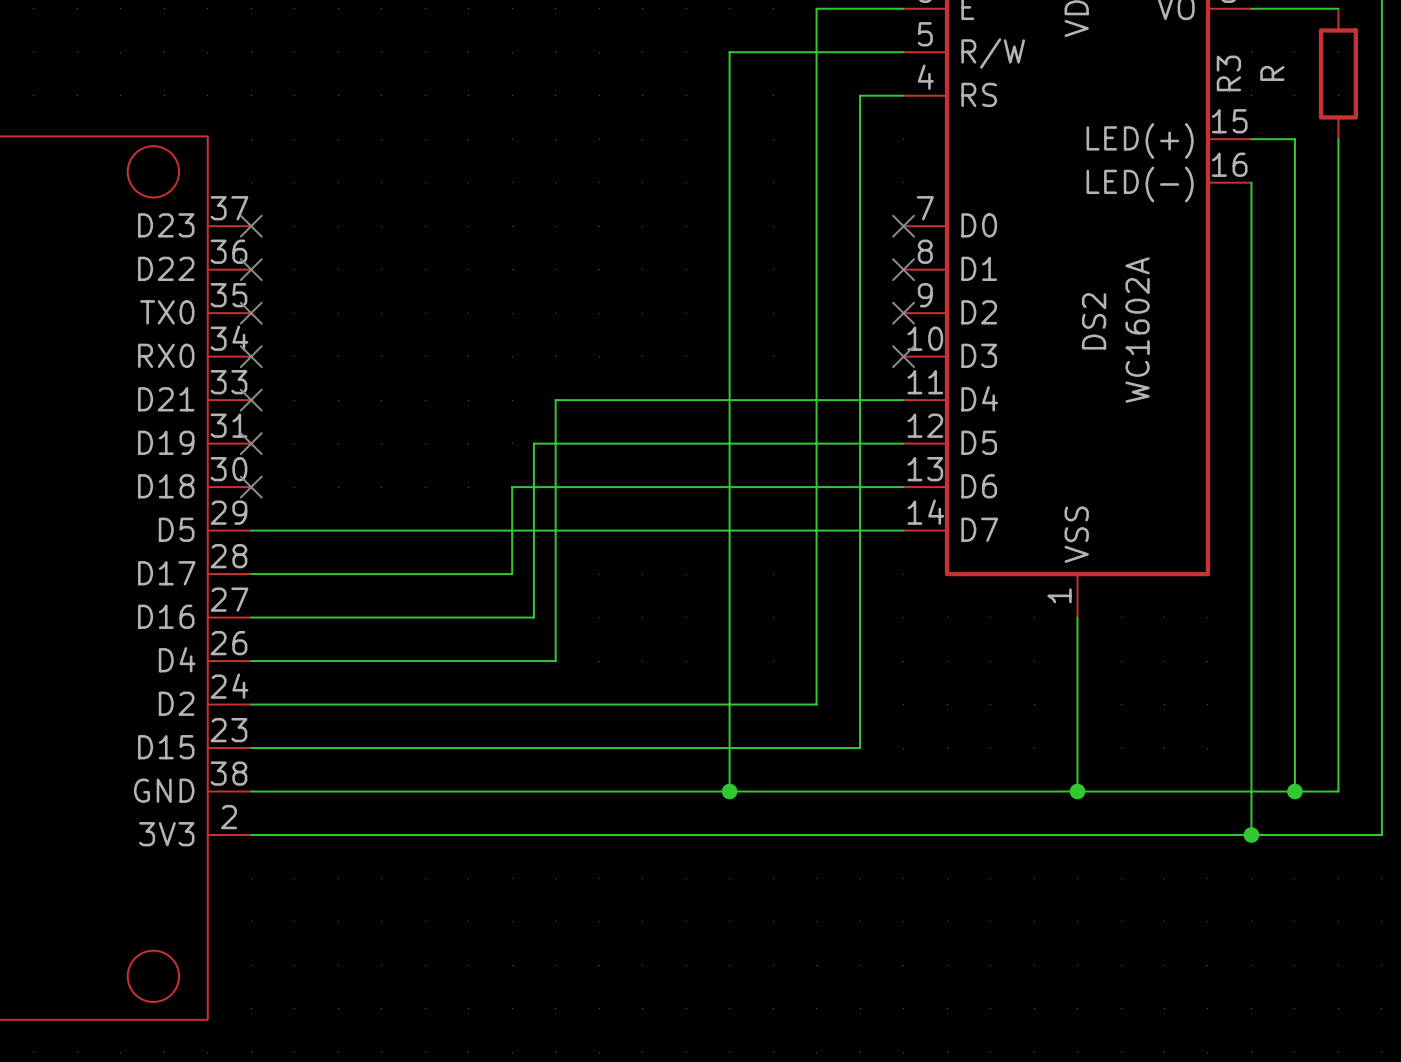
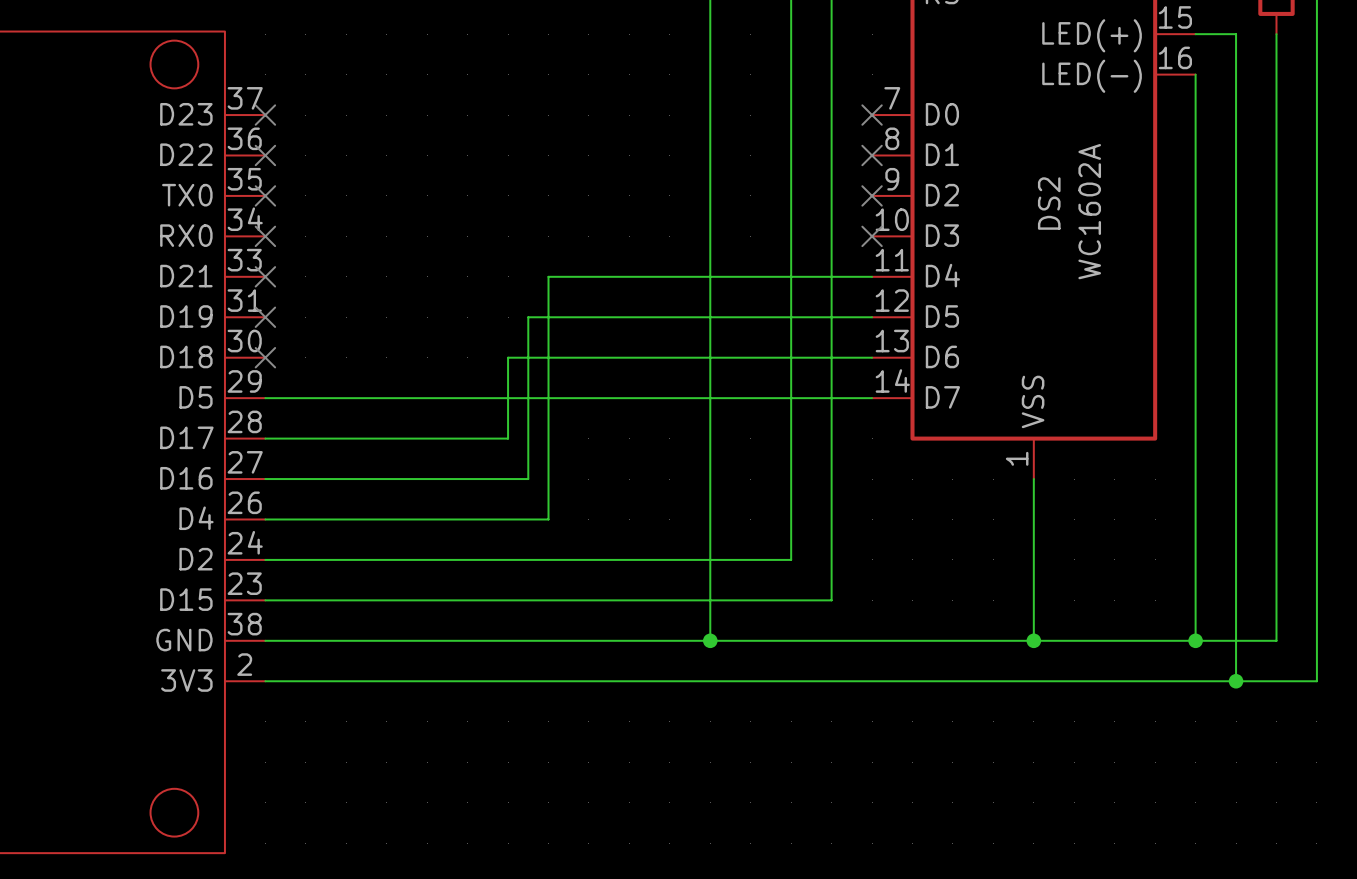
wire: (1251, 791) (1251, 835) -> (1236, 640) (1236, 681)
junction: none -> (1195, 640)
junction: (1294, 791) -> none
junction: (1251, 835) -> none
junction: none -> (1236, 681)

